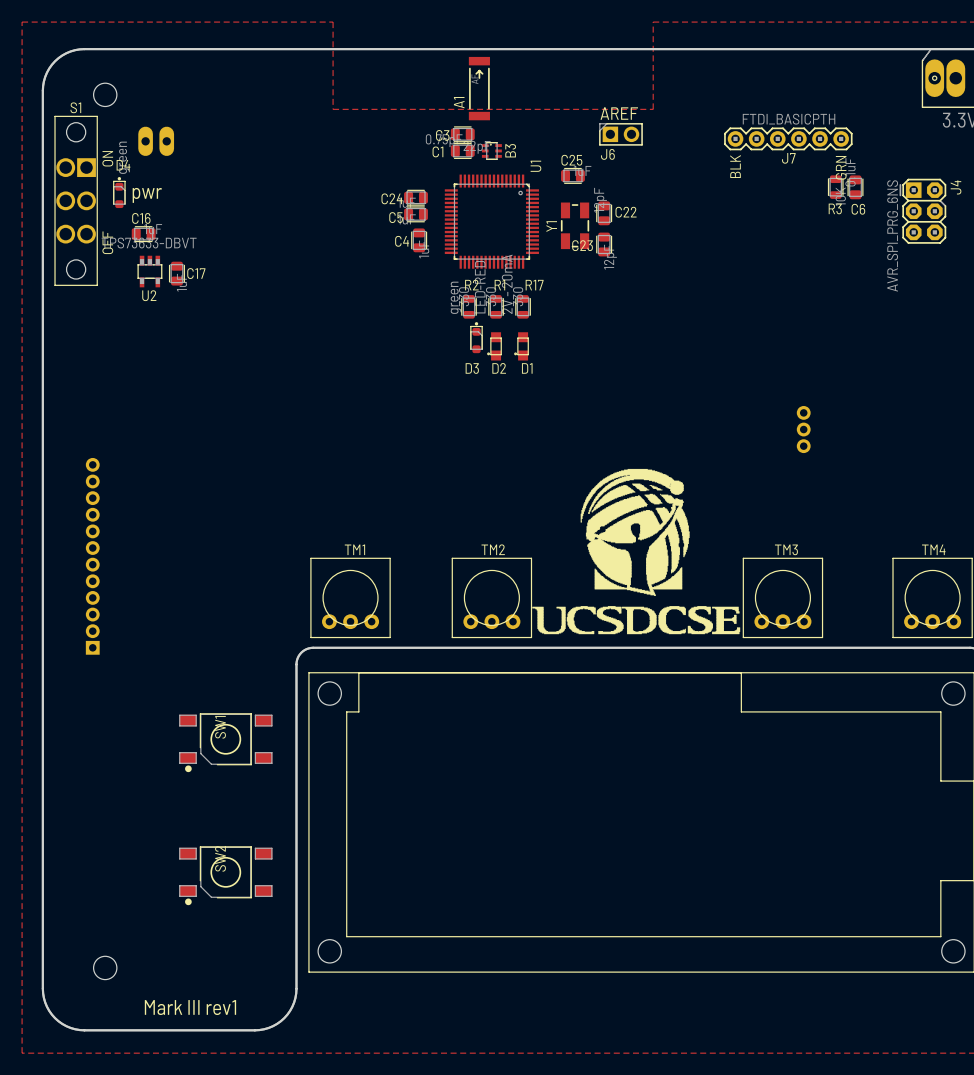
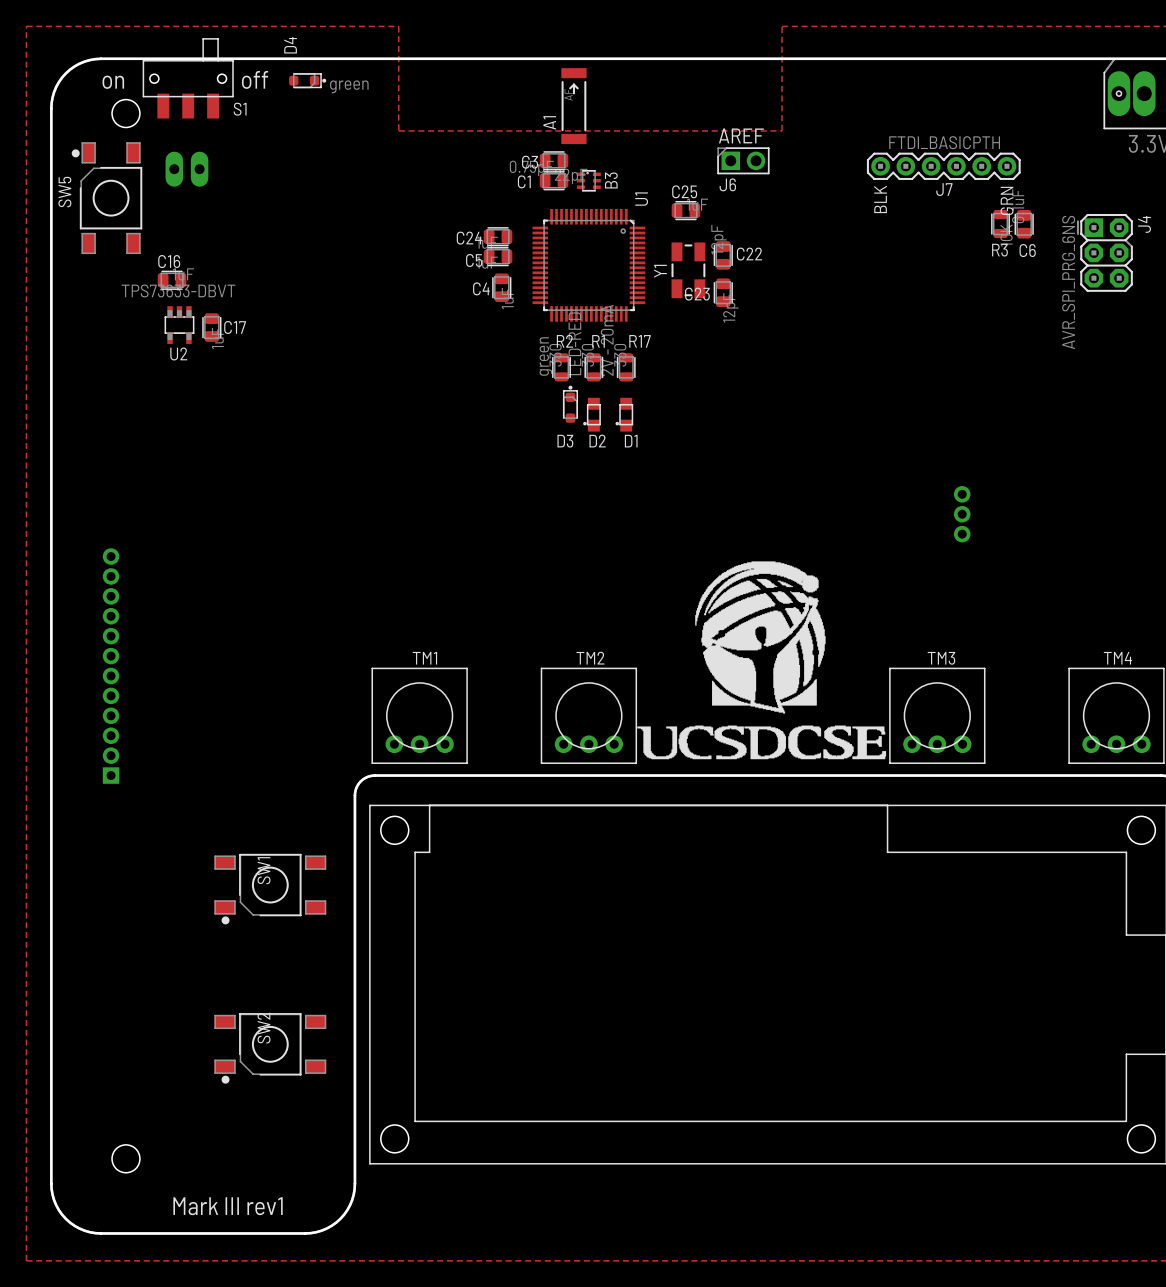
text: none -> off (255, 79)
text: none -> on (113, 82)
S1 name position: S1 (75, 107) -> S1 (240, 109)
S1 footprint: [54, 115, 98, 286] -> [142, 38, 234, 119]
SW5: none -> (106, 198)
D4 rotation: 0° (119, 192) -> 90° clockwise (307, 80)
D4 position: (119, 192) -> (307, 80)
text: pwr (147, 195) -> none

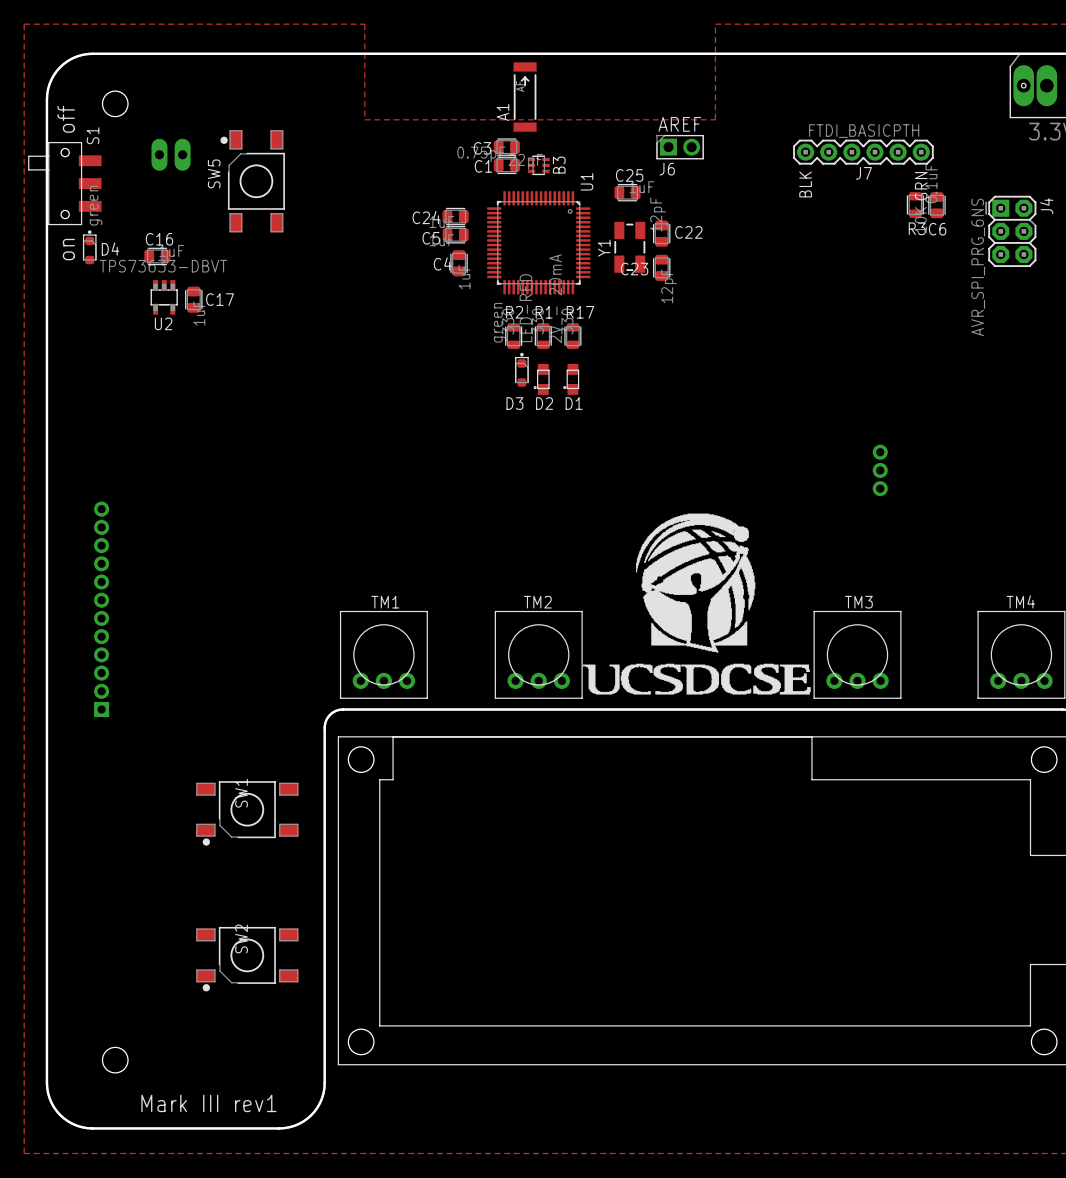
D4 name position: D4 (290, 45) -> D4 (110, 249)
S1 rotation: 0° (188, 78) -> 90° counterclockwise (64, 183)
S1 position: (188, 78) -> (64, 183)
text rotation: 0° (255, 79) -> 90° counterclockwise (66, 119)
text position: off (255, 79) -> off (66, 119)
D4 rotation: 0° (307, 80) -> 90° counterclockwise (89, 247)
D4 position: (307, 80) -> (89, 247)
text rotation: 0° (113, 82) -> 90° counterclockwise (68, 249)
text position: on (113, 82) -> on (68, 249)
SW5 position: (106, 198) -> (252, 181)

